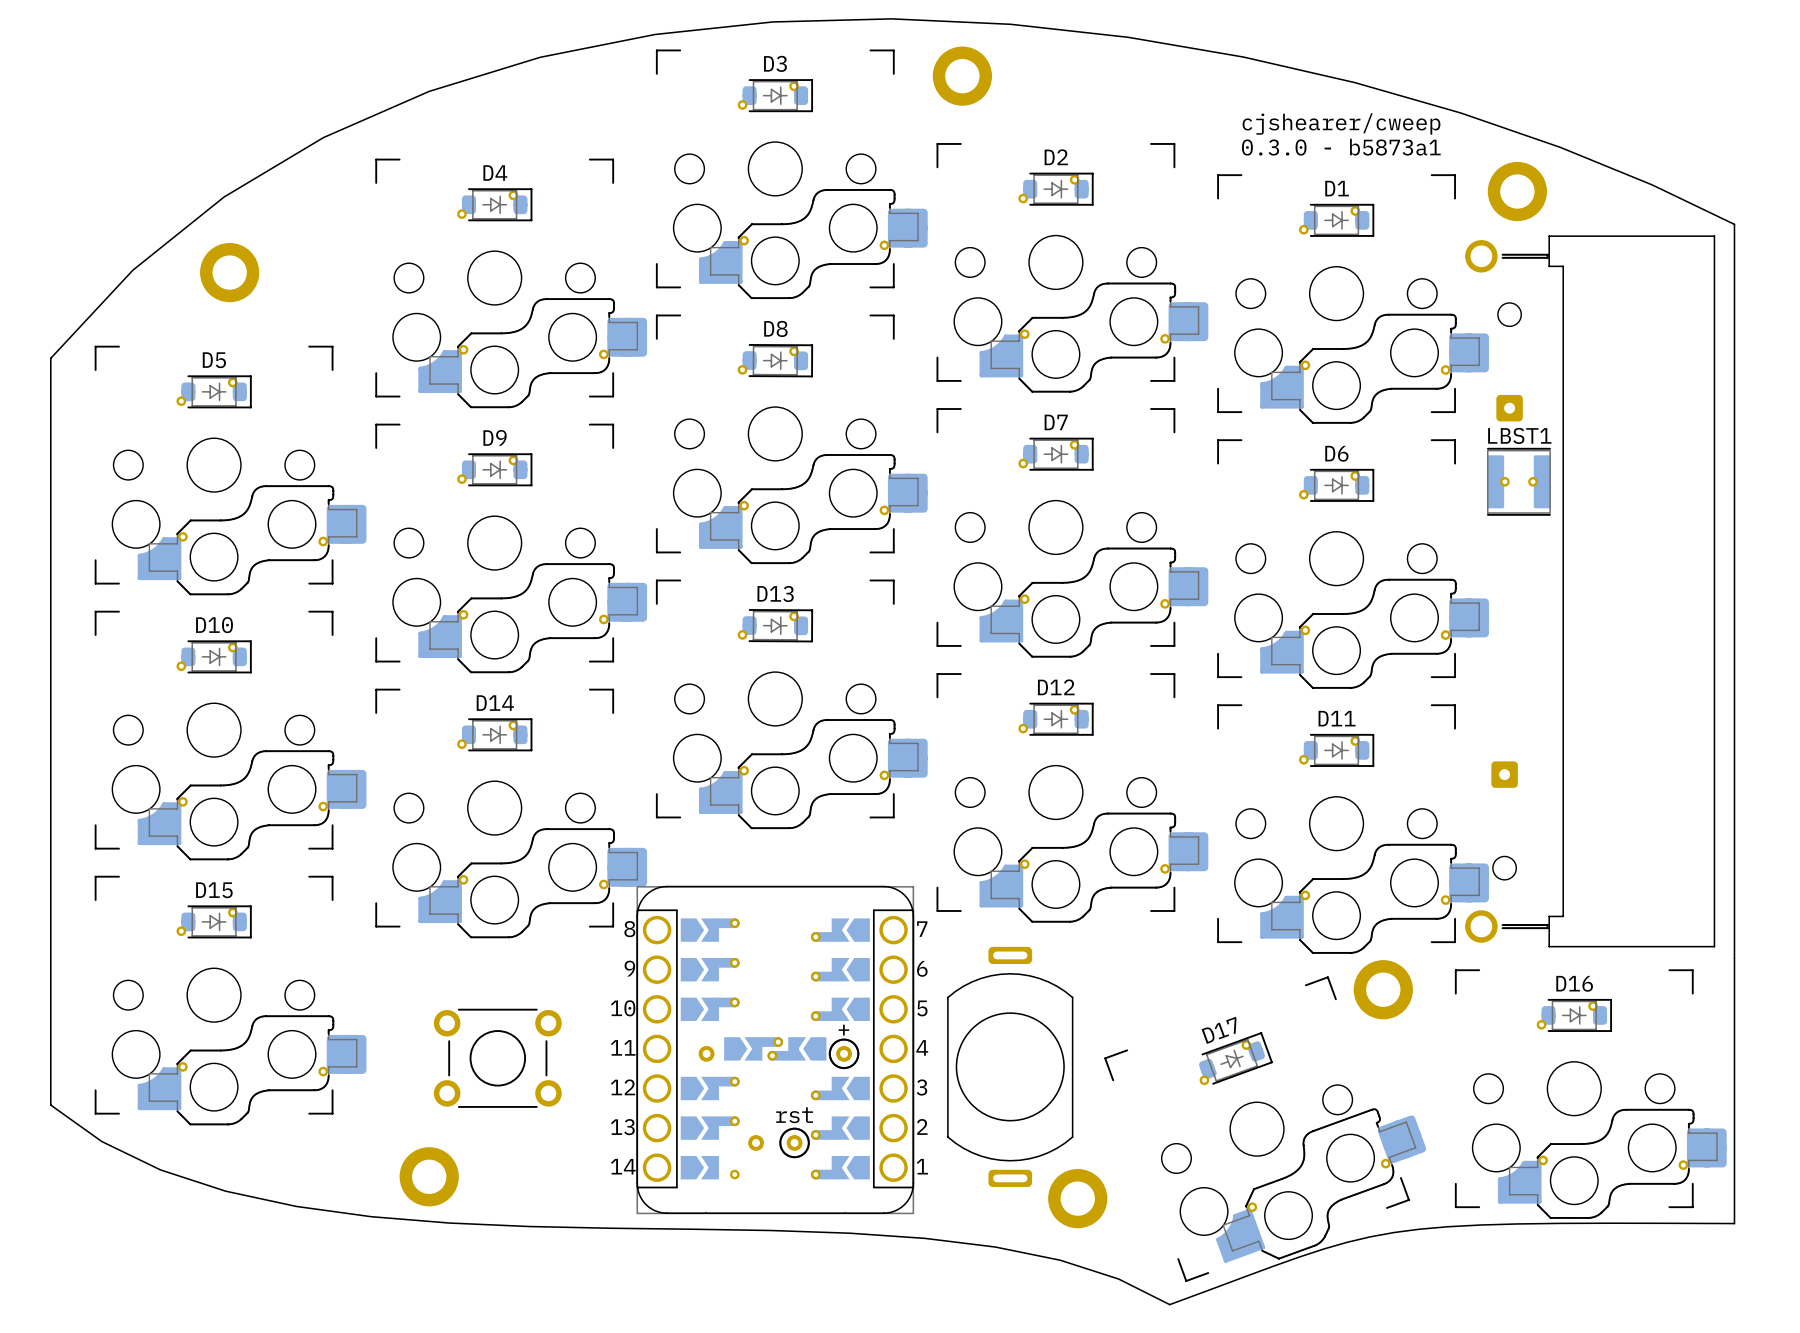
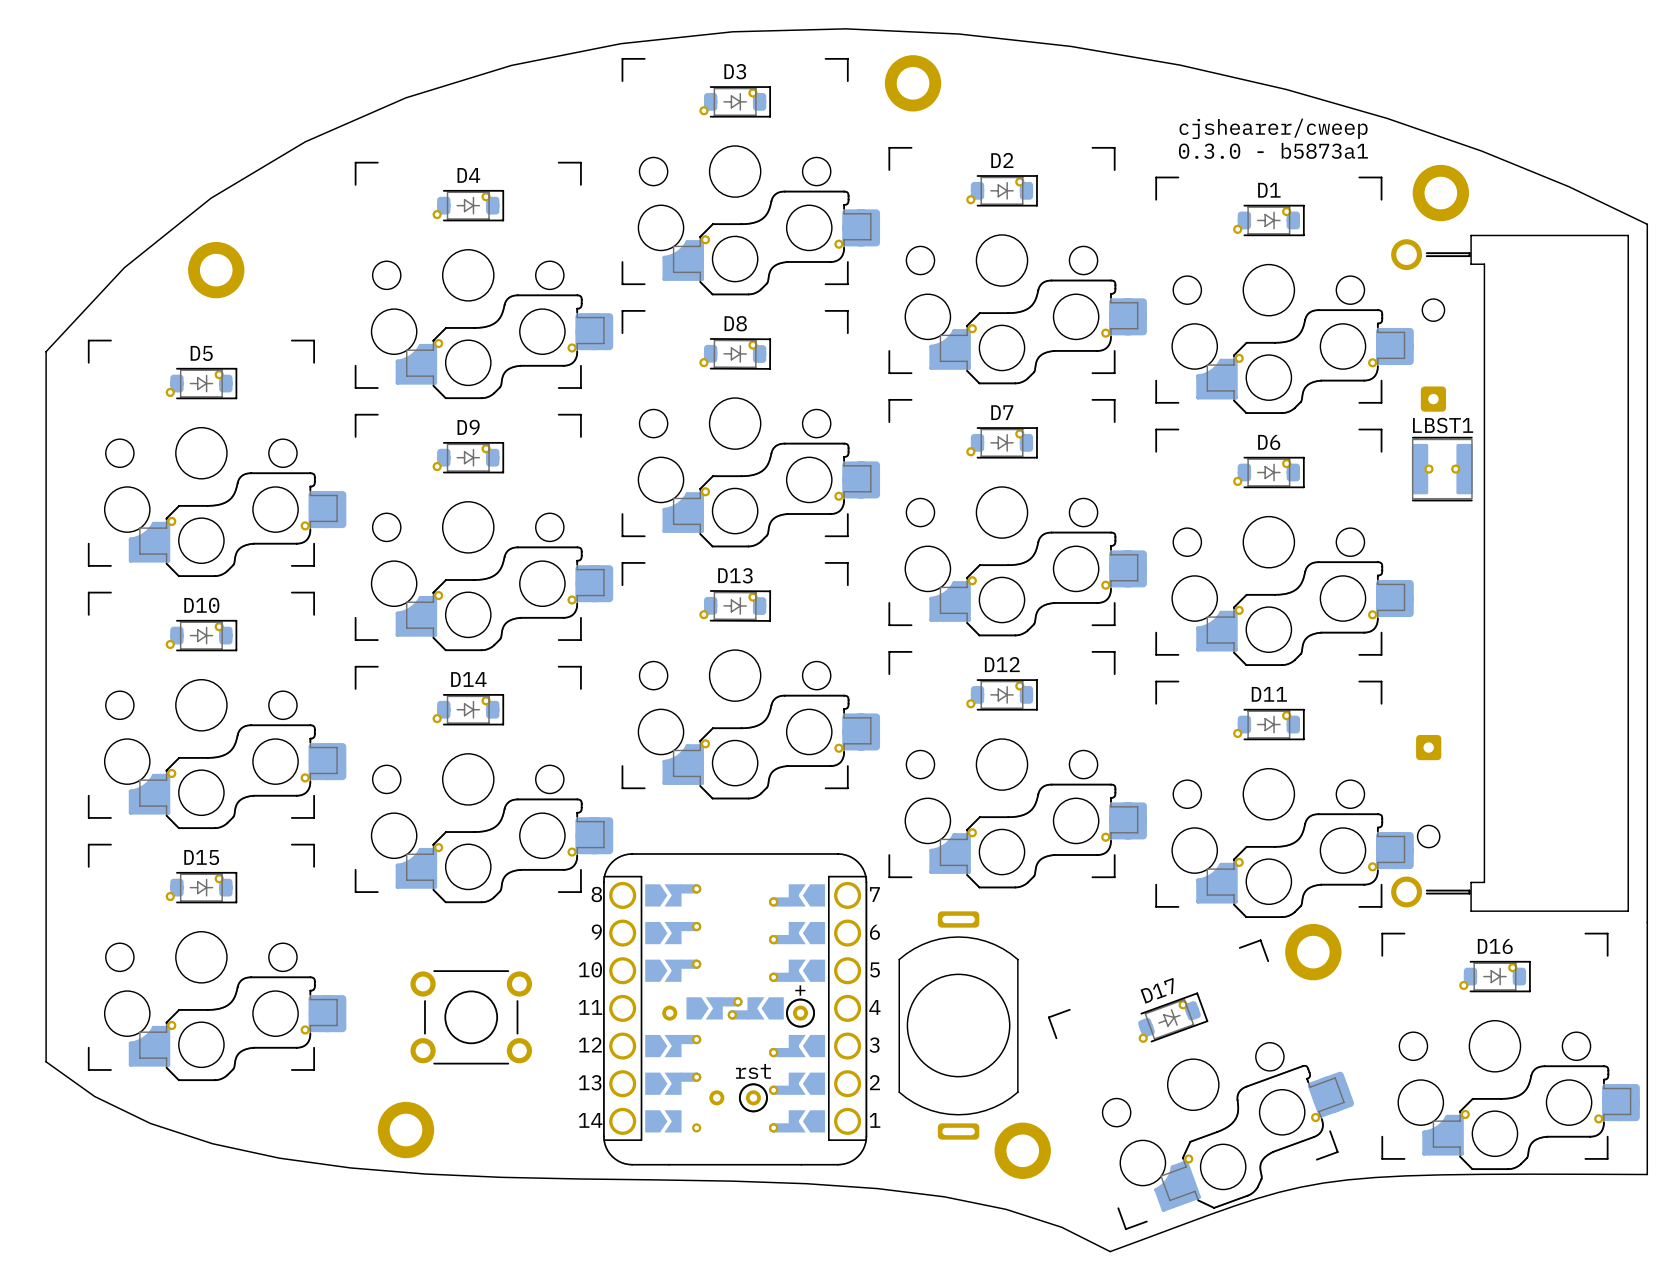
part footprint: [636, 885, 915, 1215] -> [603, 853, 868, 1166]

